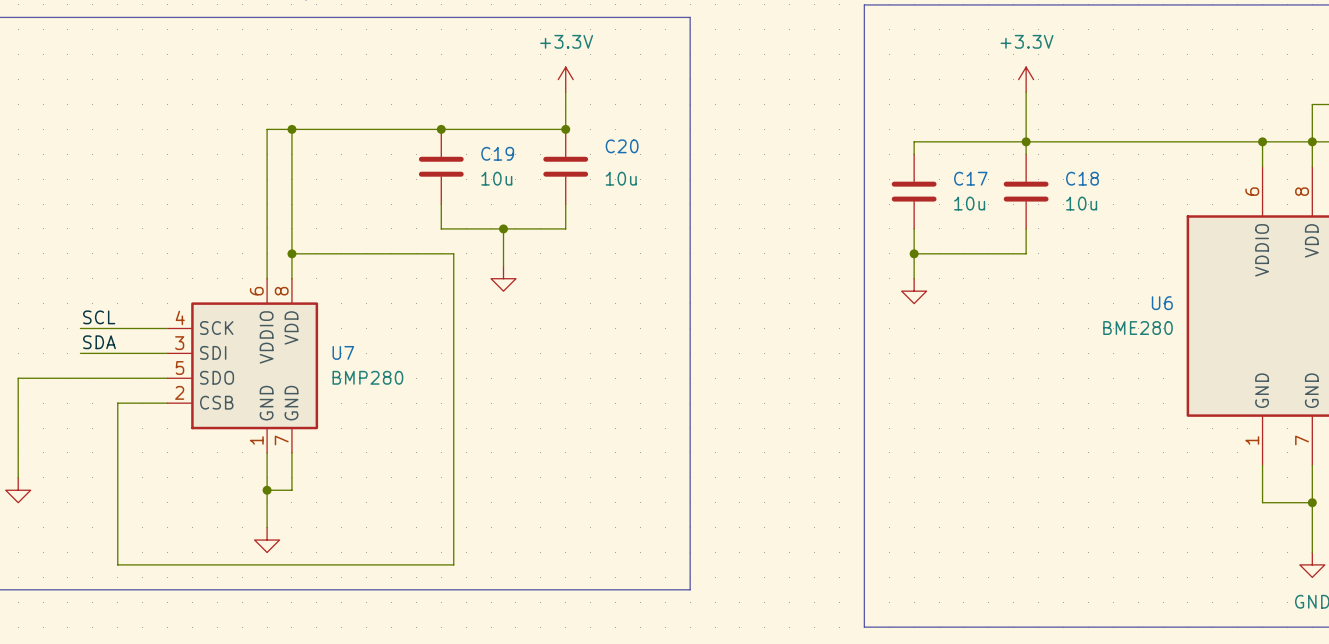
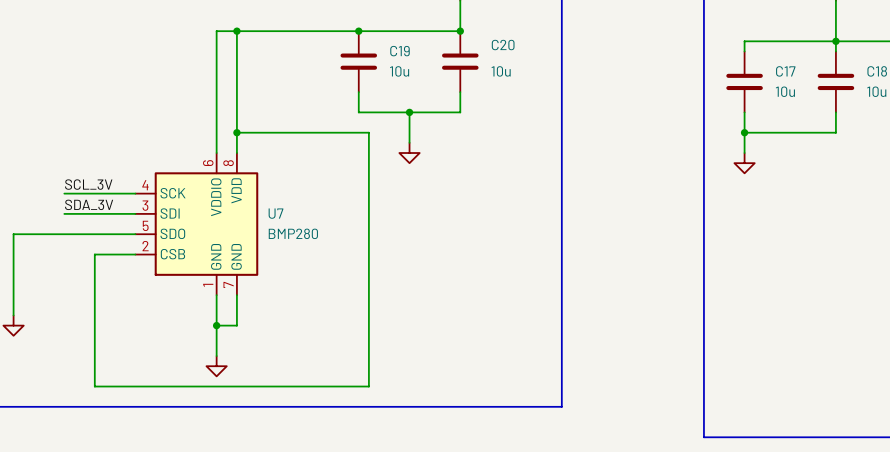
label: SCL (99, 317) -> SCL_3V (88, 184)
label: SDA (99, 342) -> SDA_3V (89, 204)

